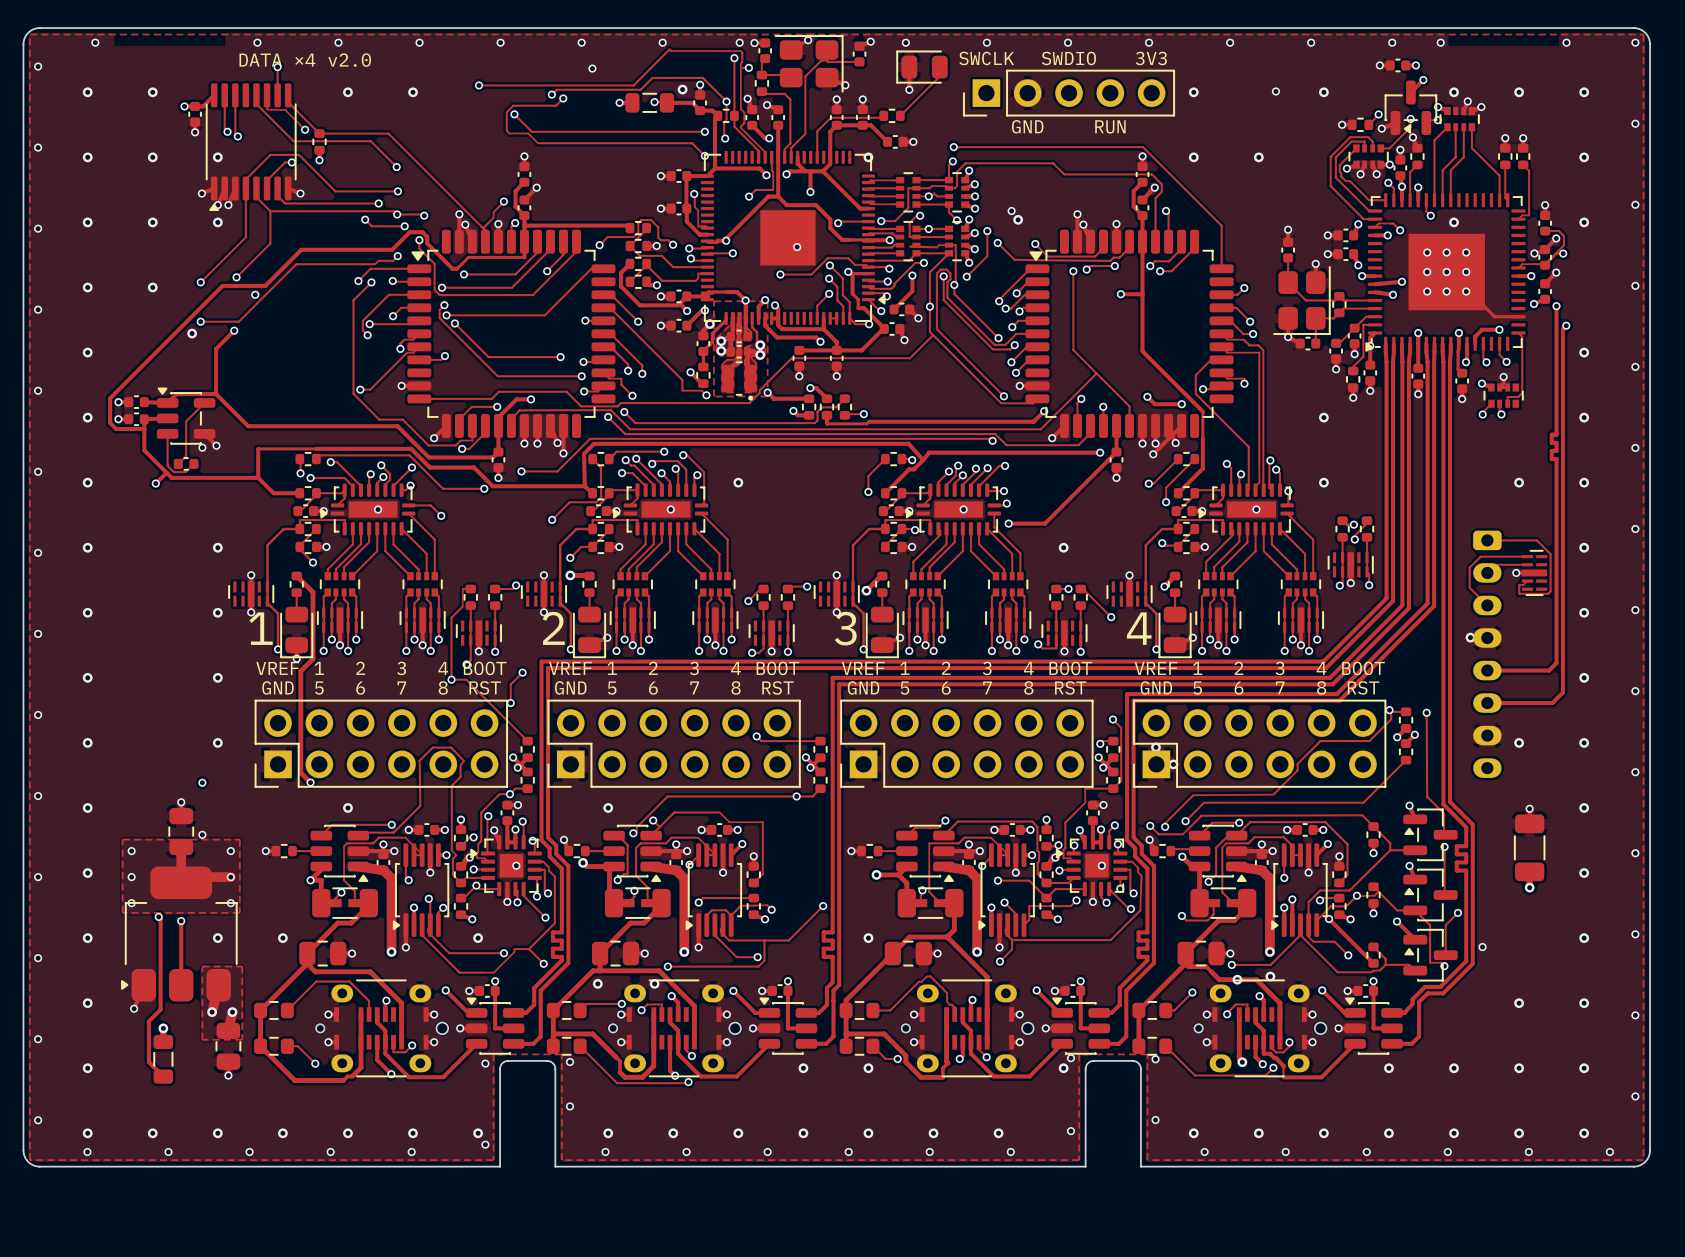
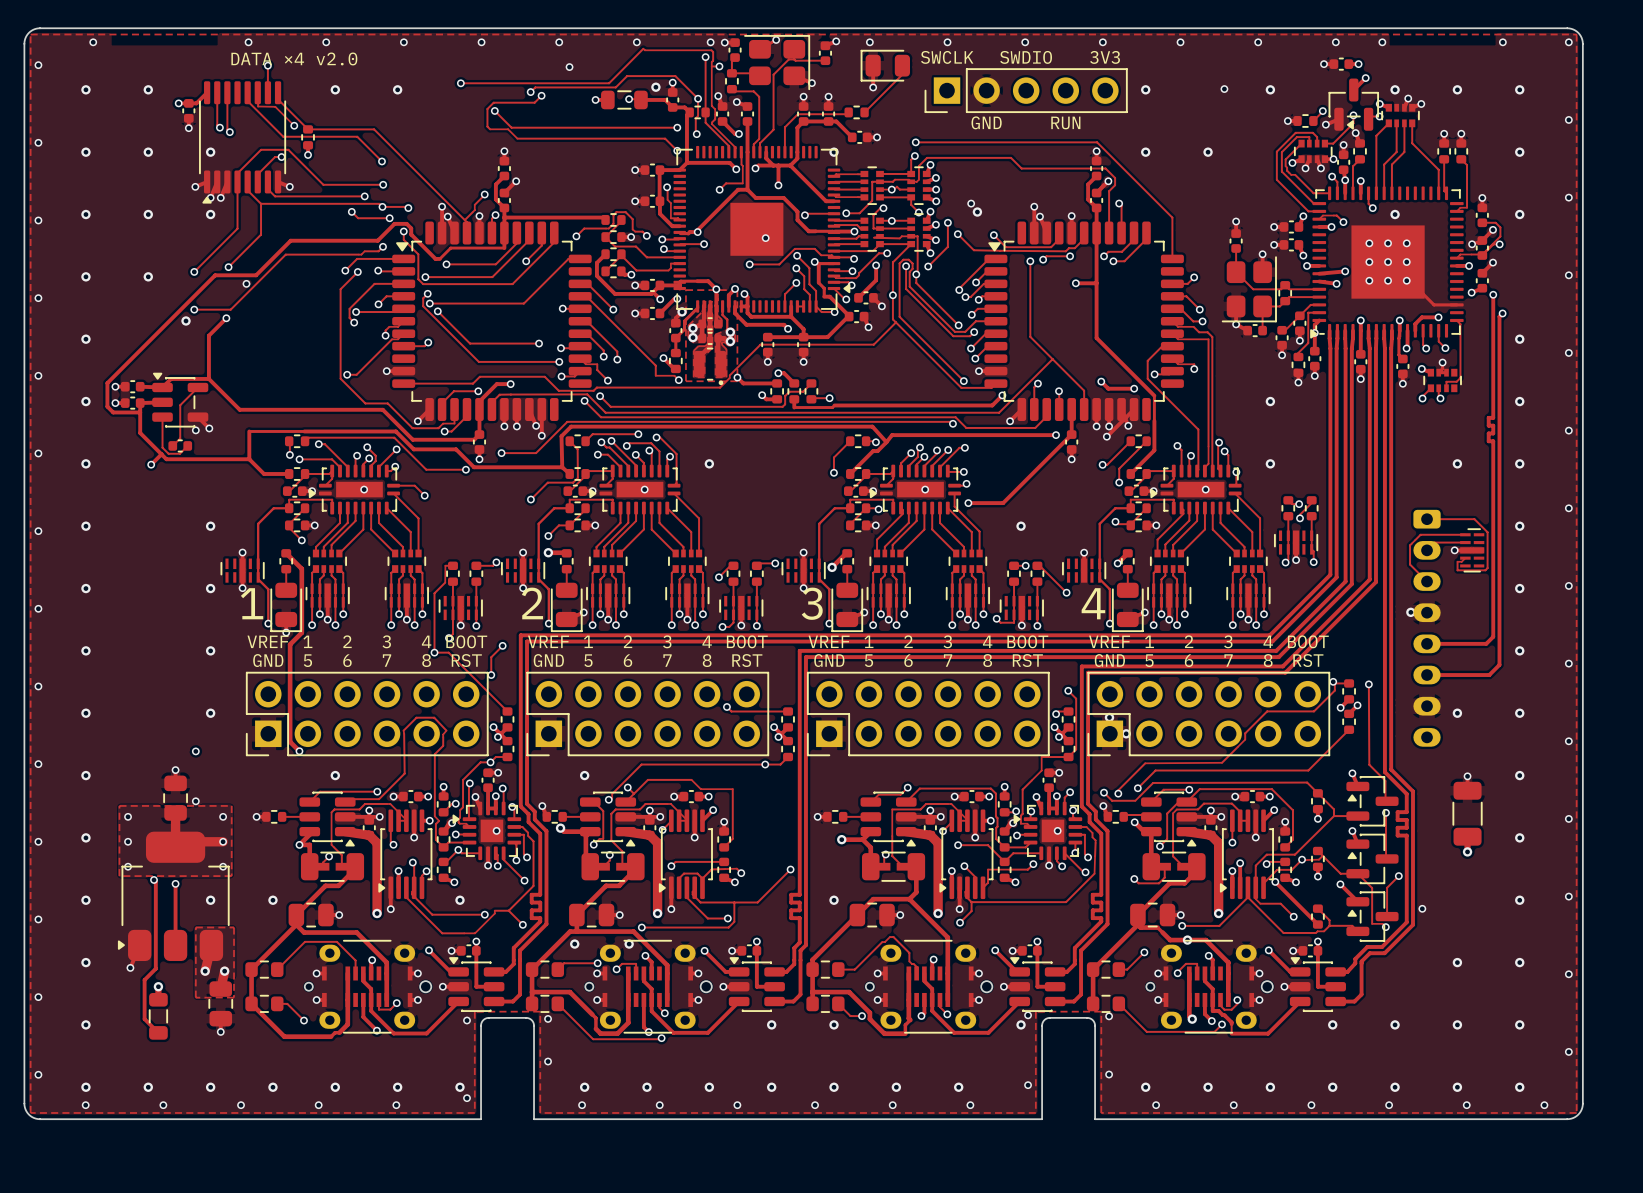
via: (1270, 976) -> none

